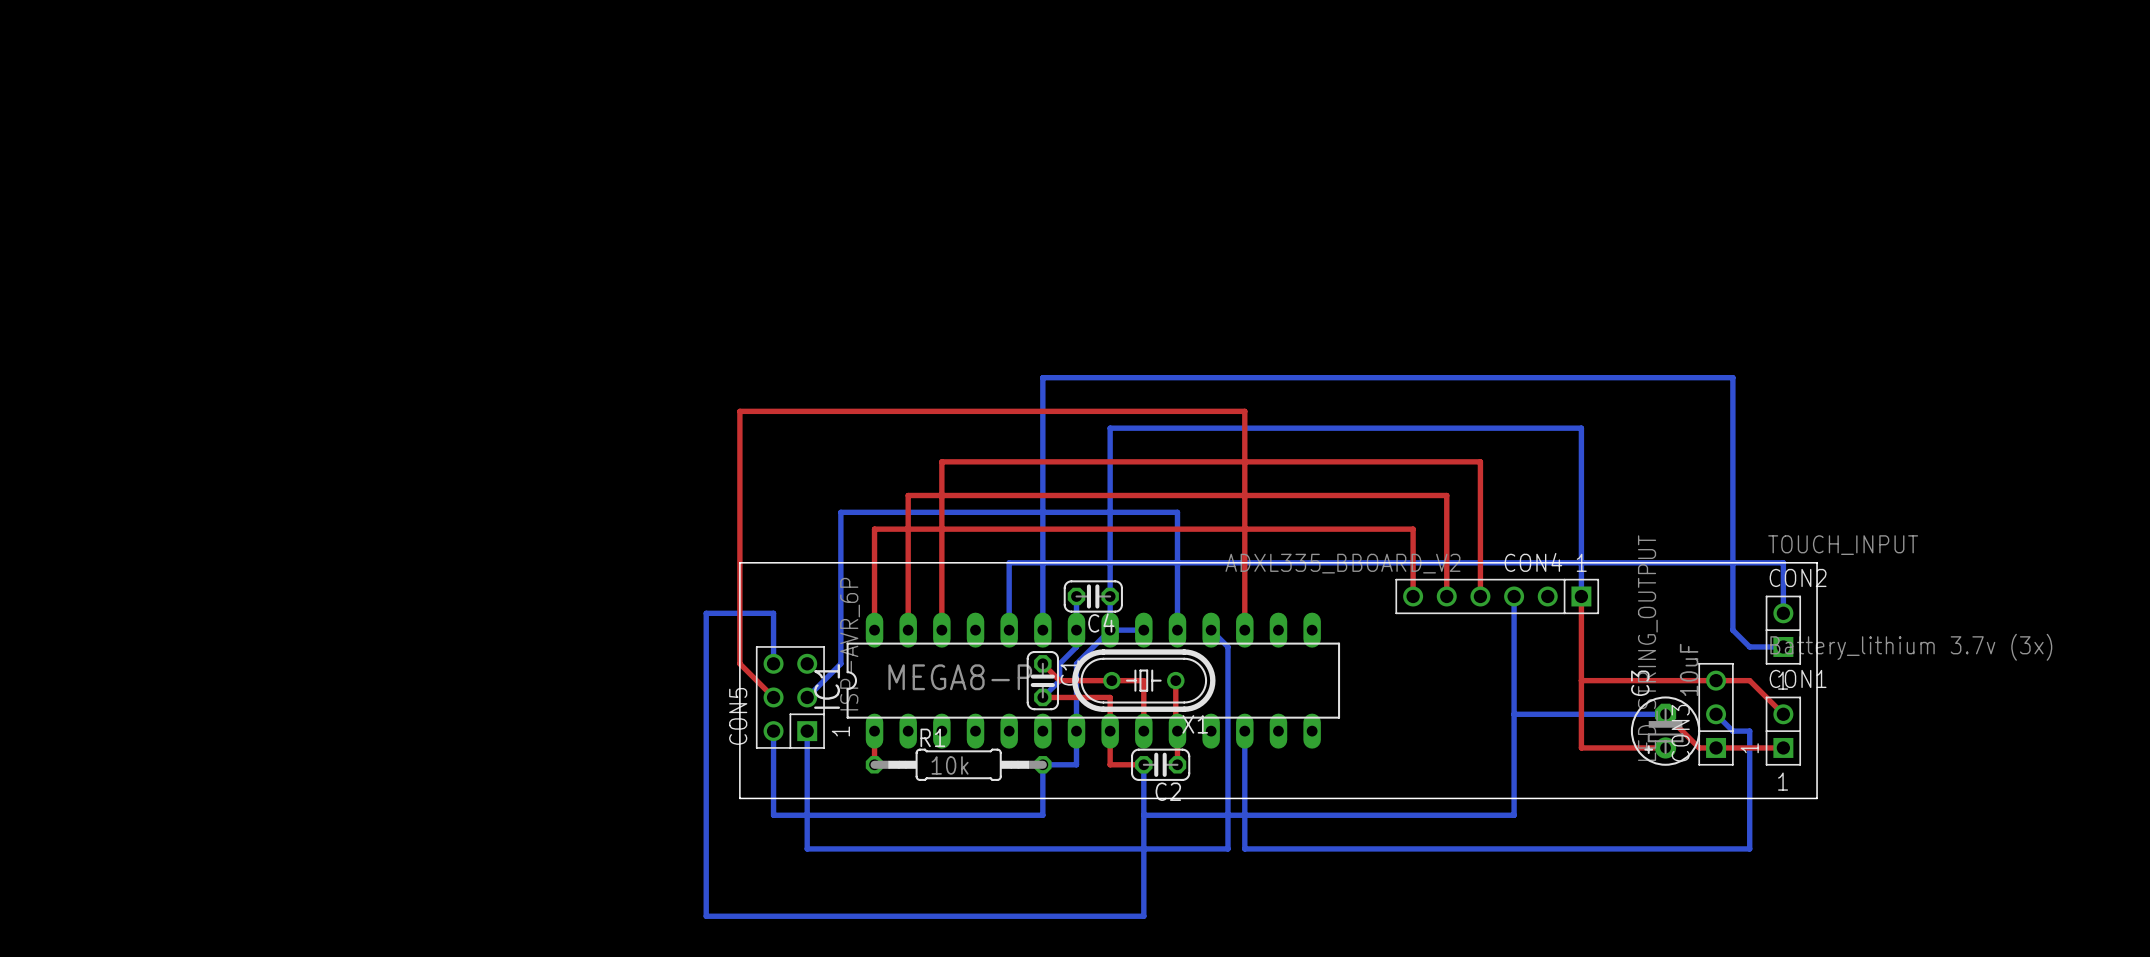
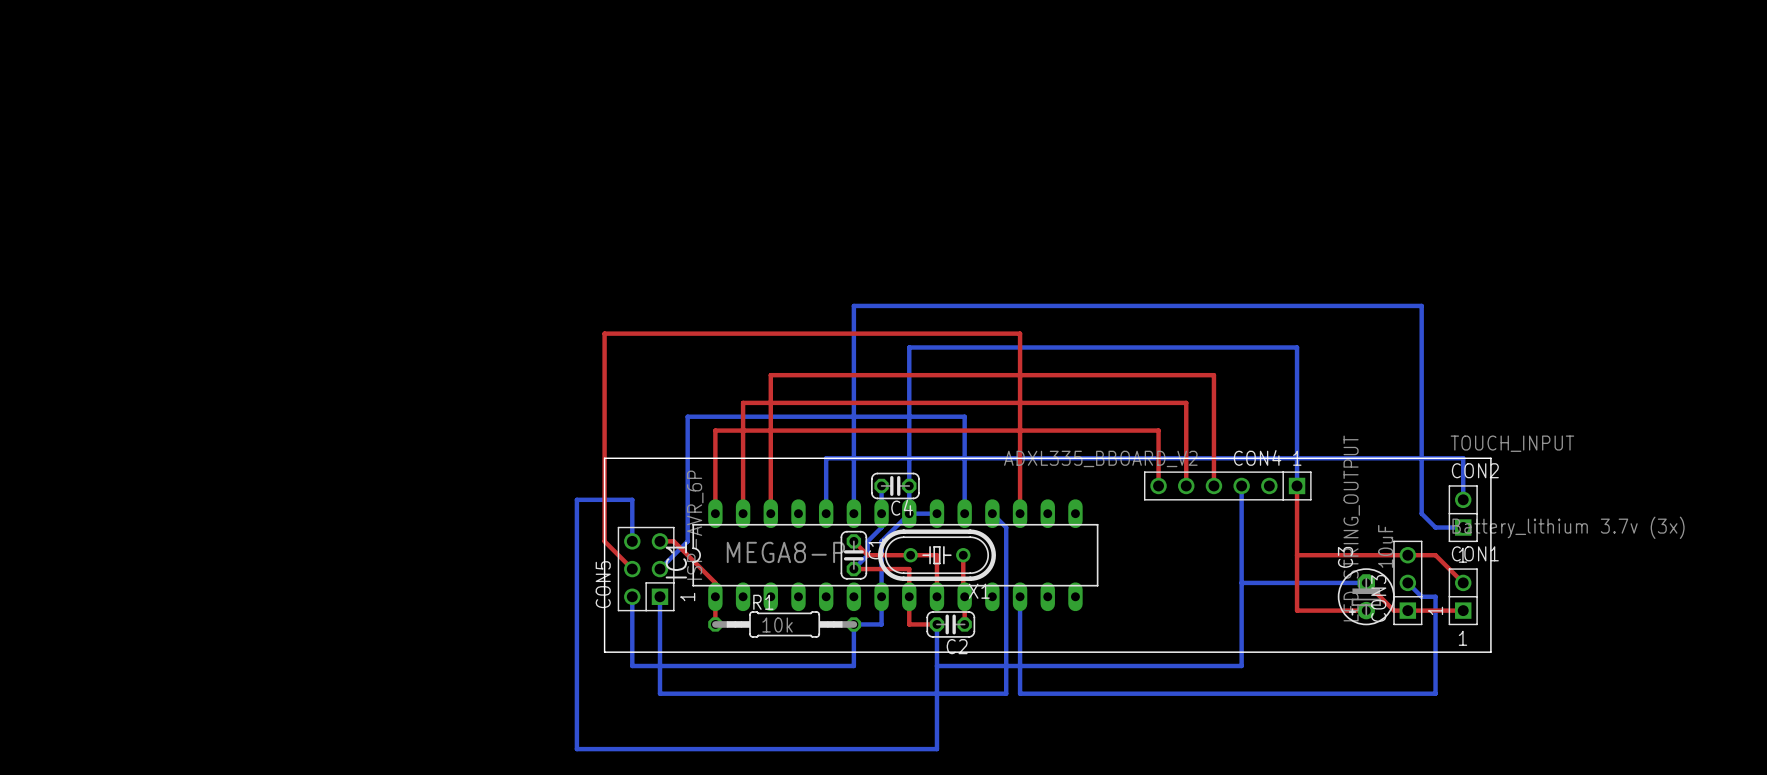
top track: none -> (659, 541) (673, 541) (715, 582) (715, 596)

